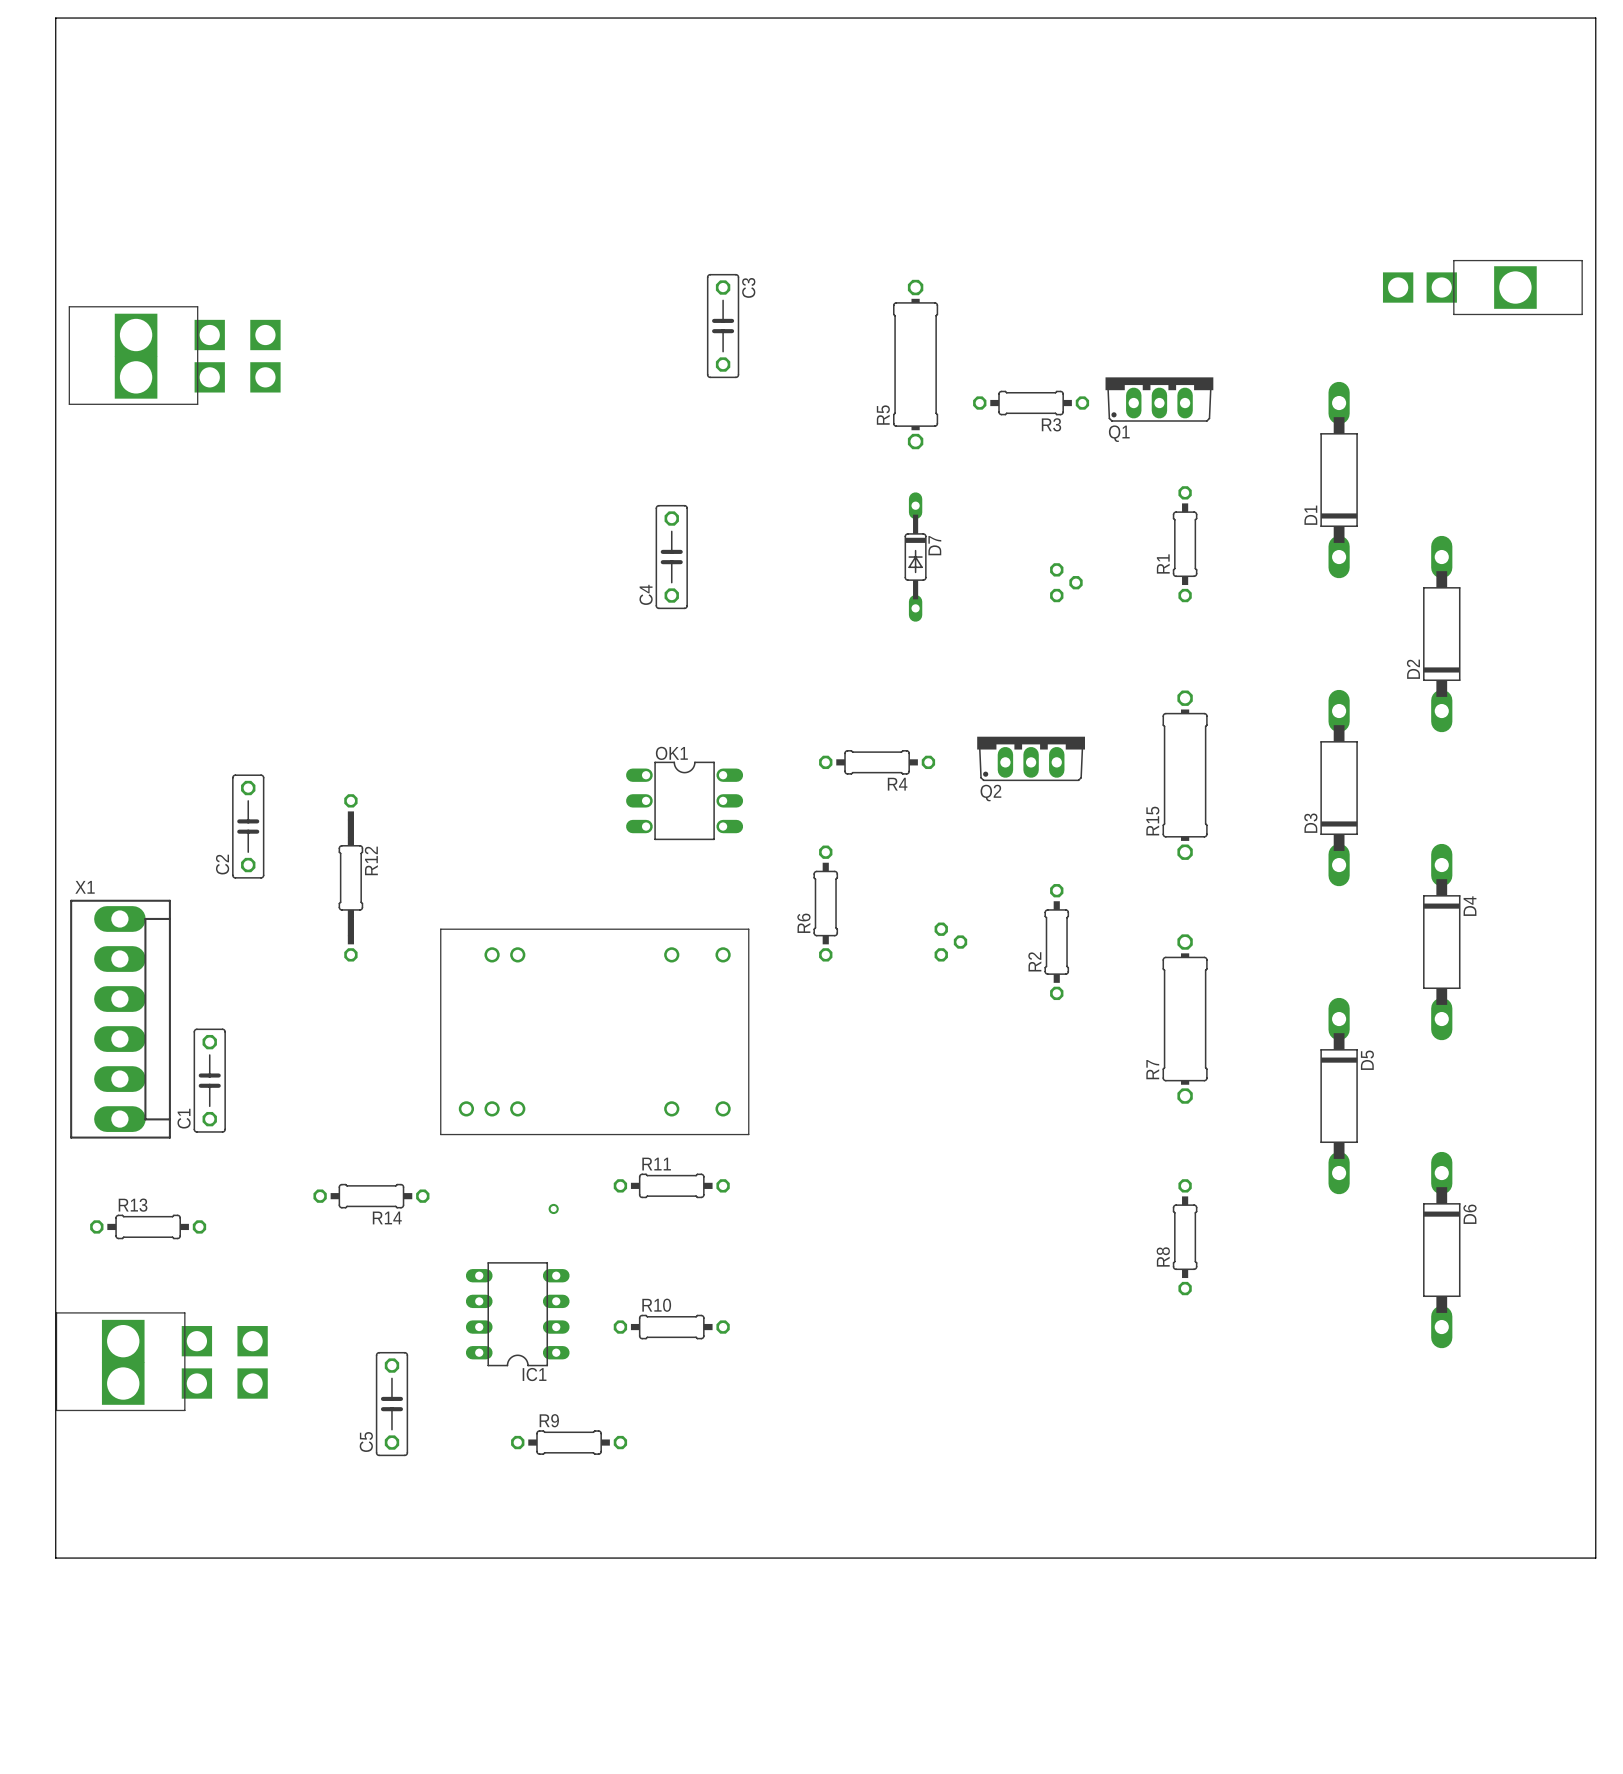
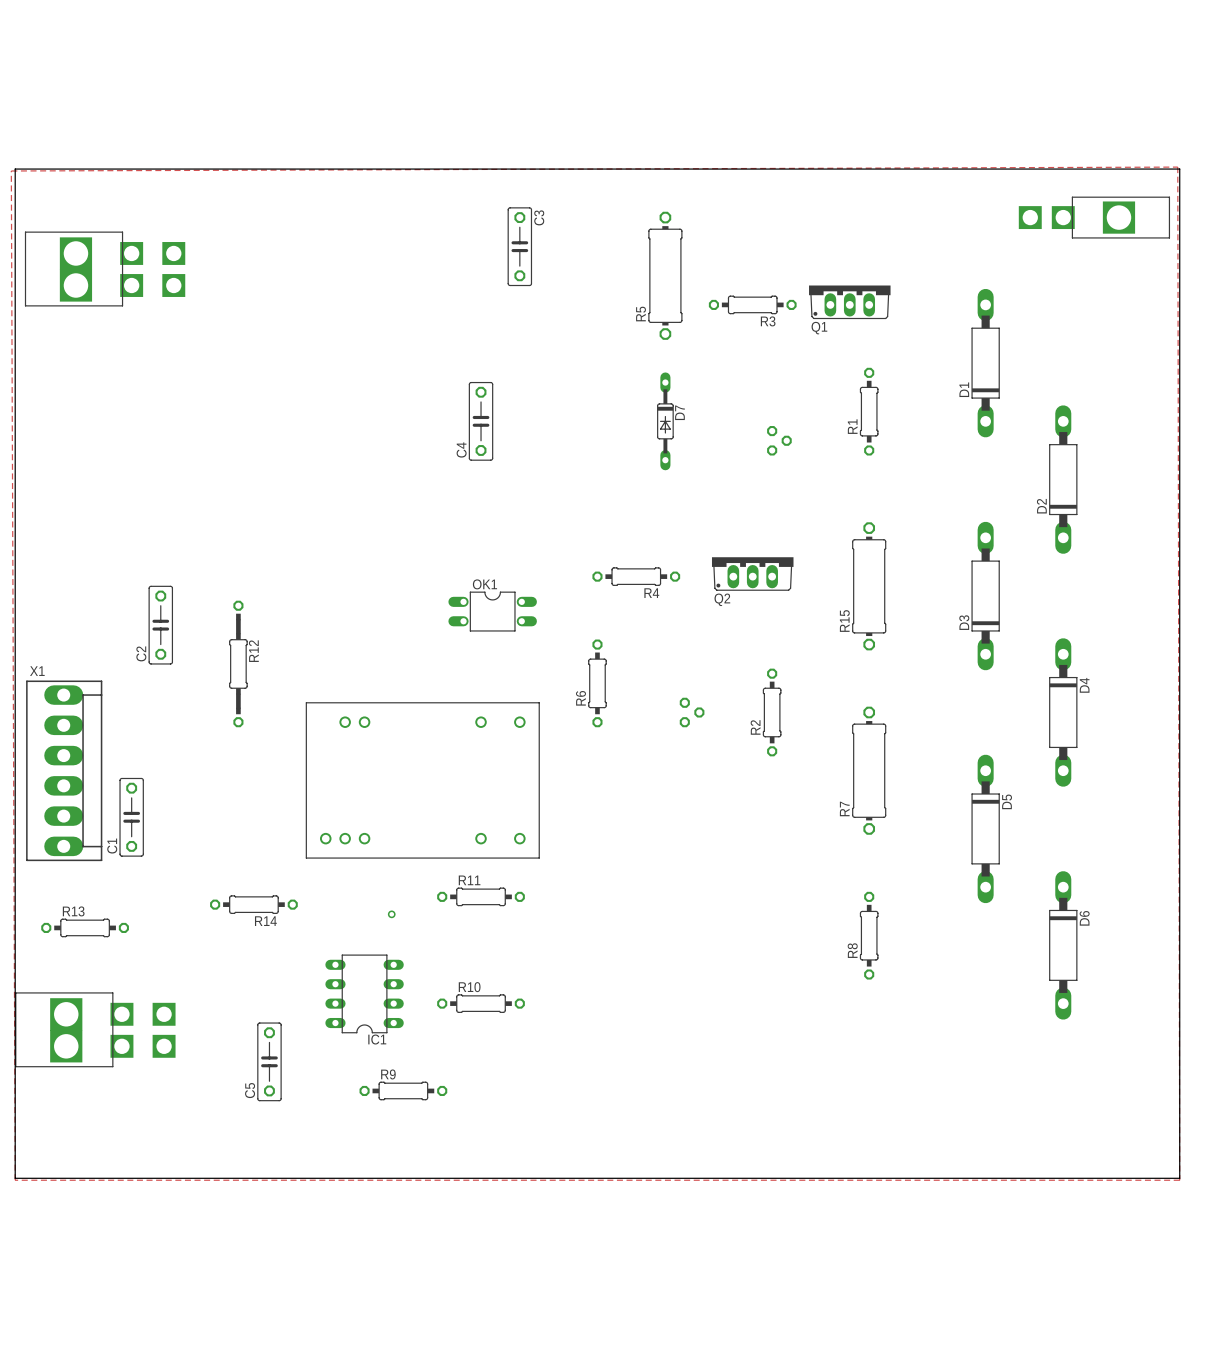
zone outline: none -> (1177, 167) (11, 170) (15, 1180) (1179, 1180) (1177, 167)
board edge: (55, 223) (55, 18) (1595, 18) (1595, 223) -> (15, 169) (1179, 169)
OK1 footprint: [626, 761, 744, 841] -> [448, 591, 537, 632]

